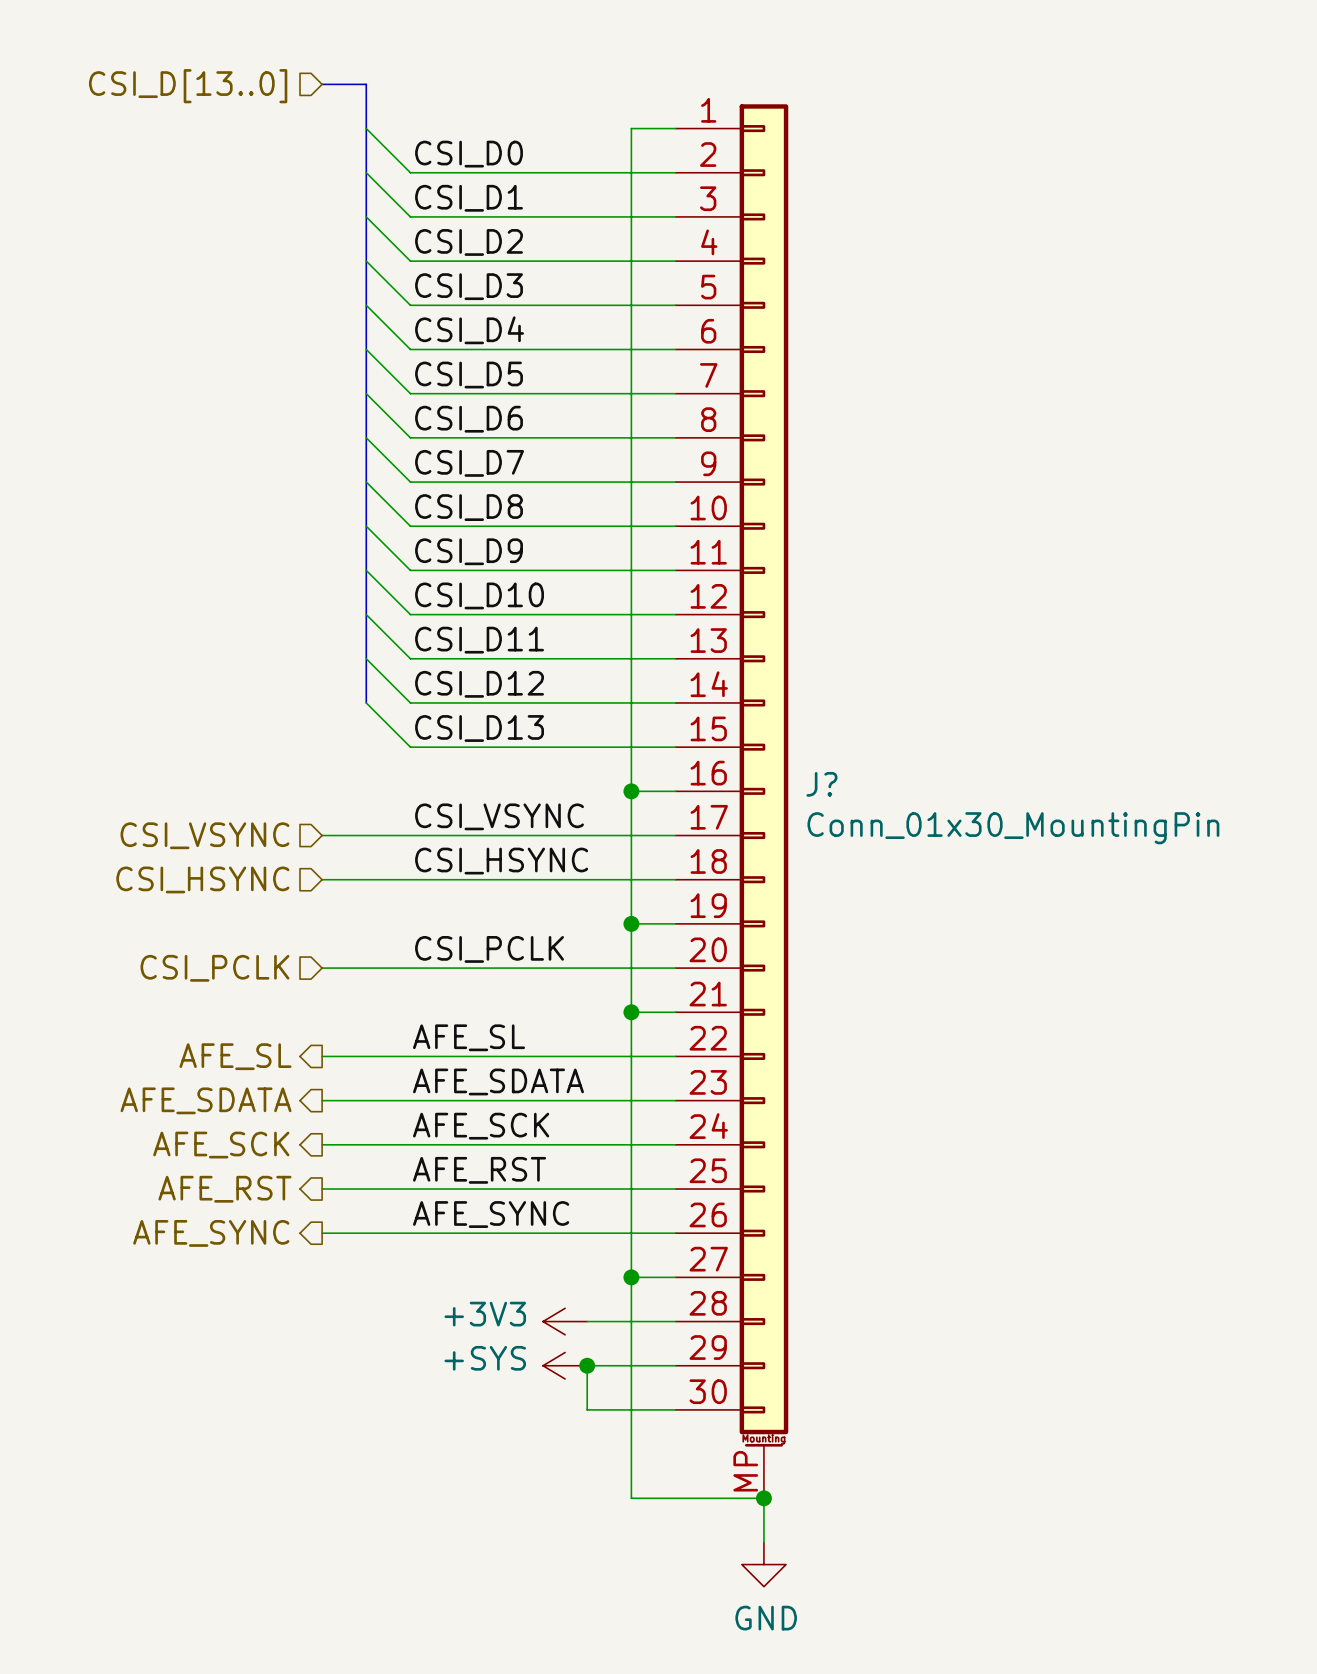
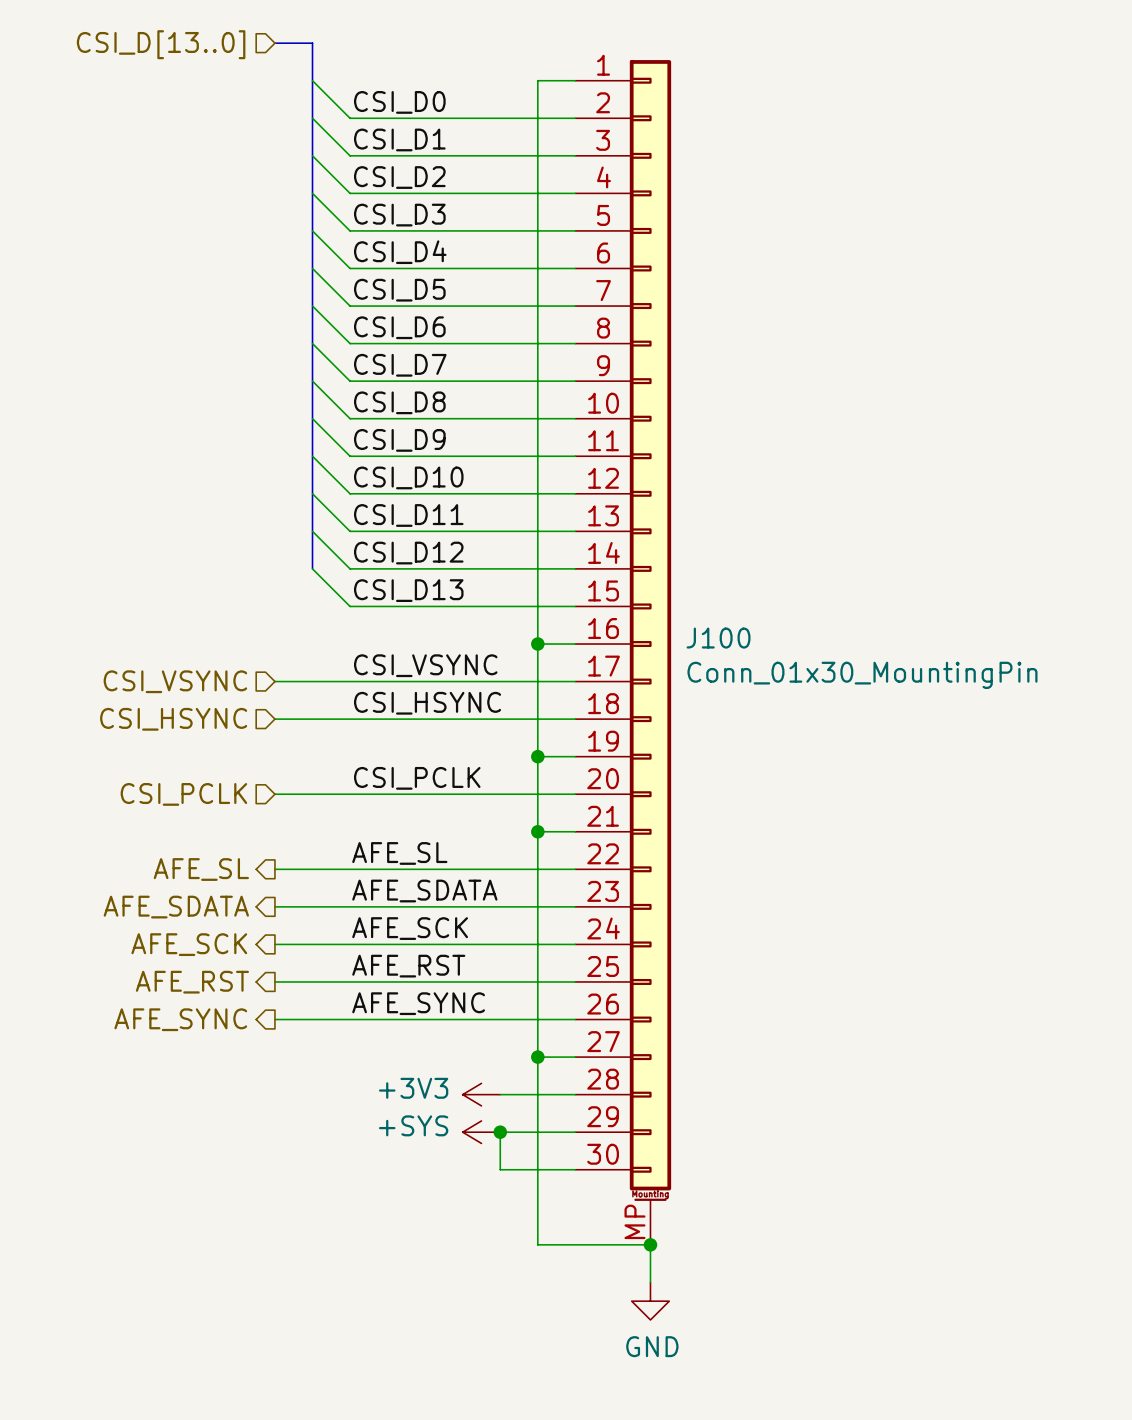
J? name: J? (821, 784) -> J100 (718, 638)

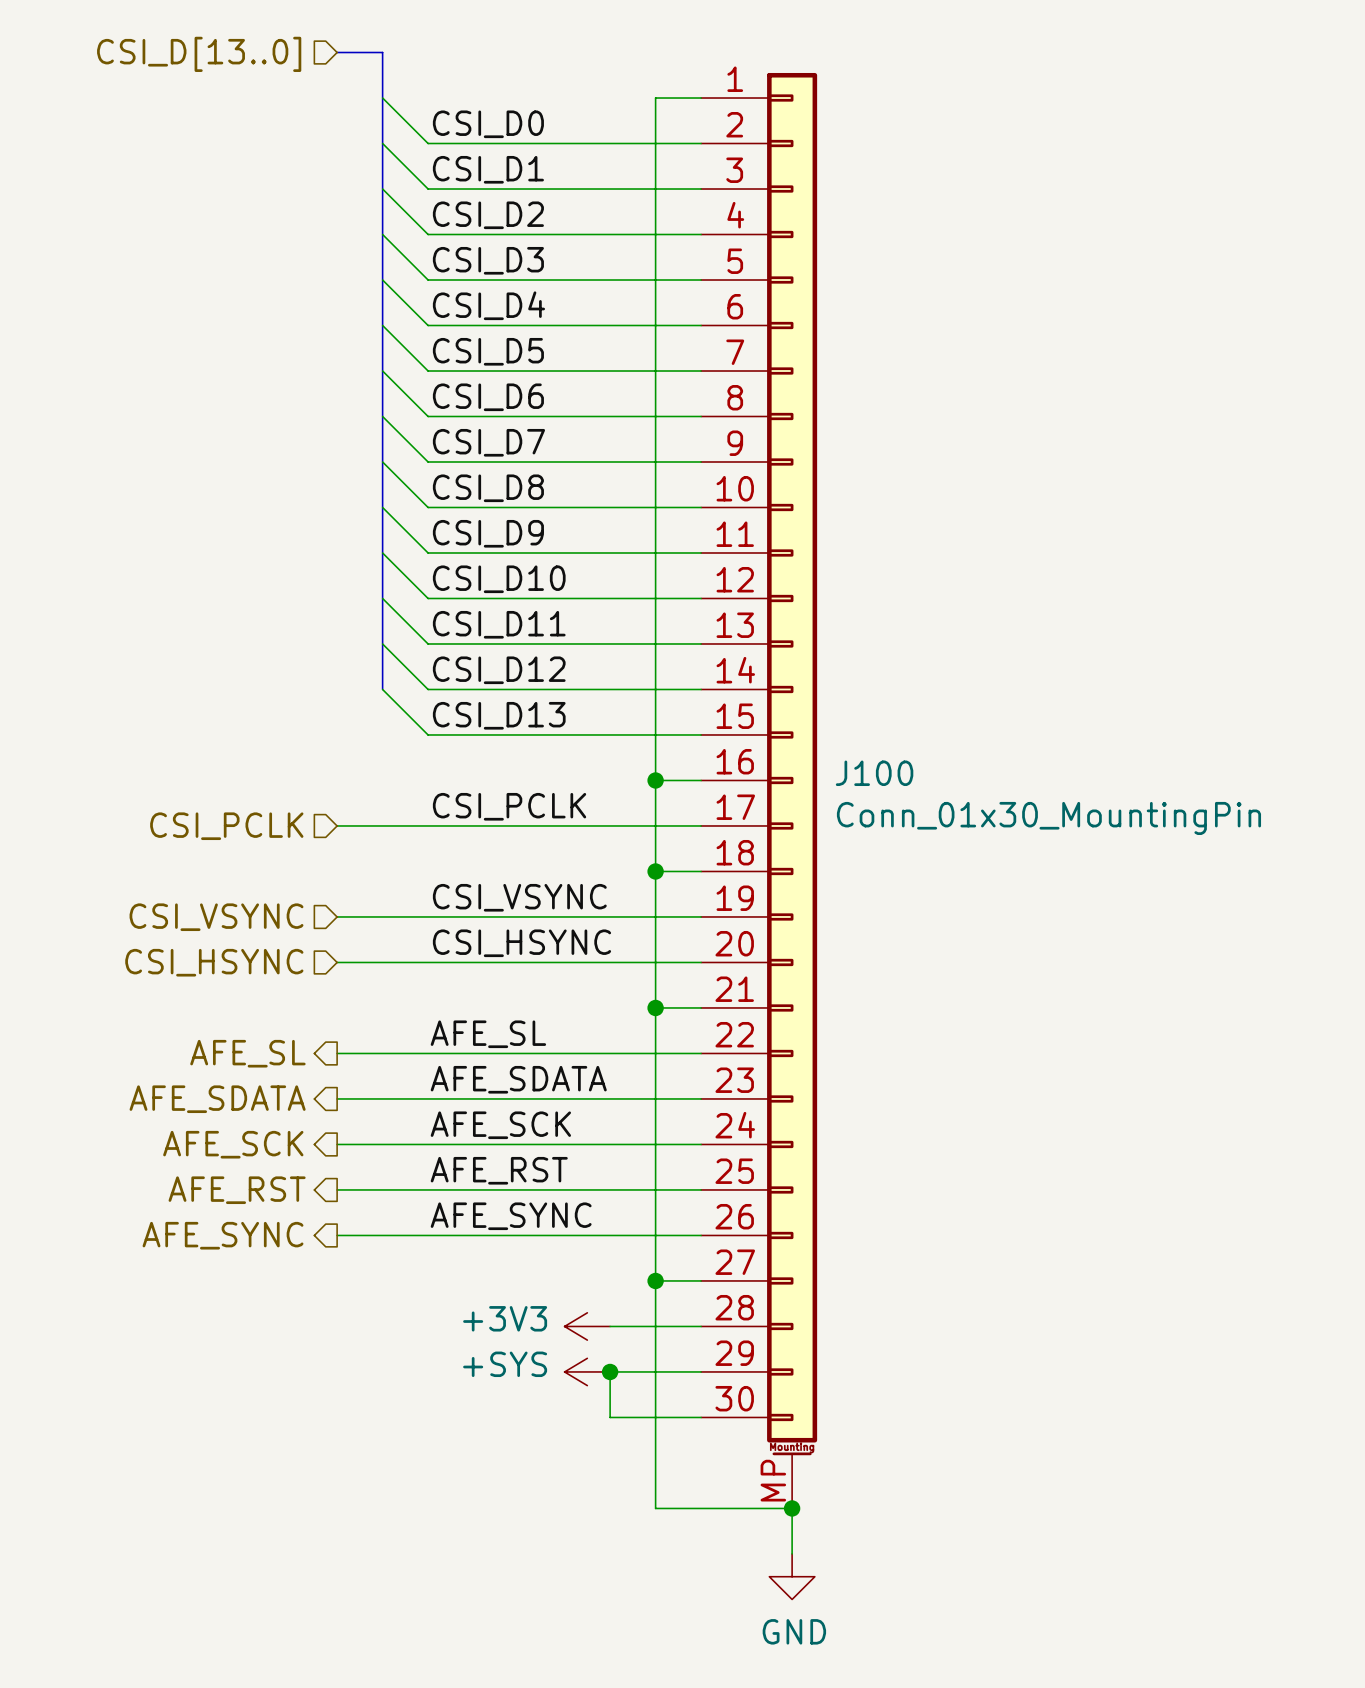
label: CSI_VSYNC (425, 665) -> CSI_PCLK (509, 806)
hierarchical label: CSI_VSYNC (175, 681) -> CSI_PCLK (226, 826)
label: CSI_HSYNC (427, 703) -> CSI_VSYNC (519, 897)
hierarchical label: CSI_HSYNC (173, 719) -> CSI_VSYNC (216, 917)
wire: (274, 719) (537, 719) -> (337, 916) (655, 916)
junction position: (537, 756) -> (655, 871)
label: CSI_PCLK (417, 778) -> CSI_HSYNC (521, 943)
hierarchical label: CSI_PCLK (183, 794) -> CSI_HSYNC (214, 962)

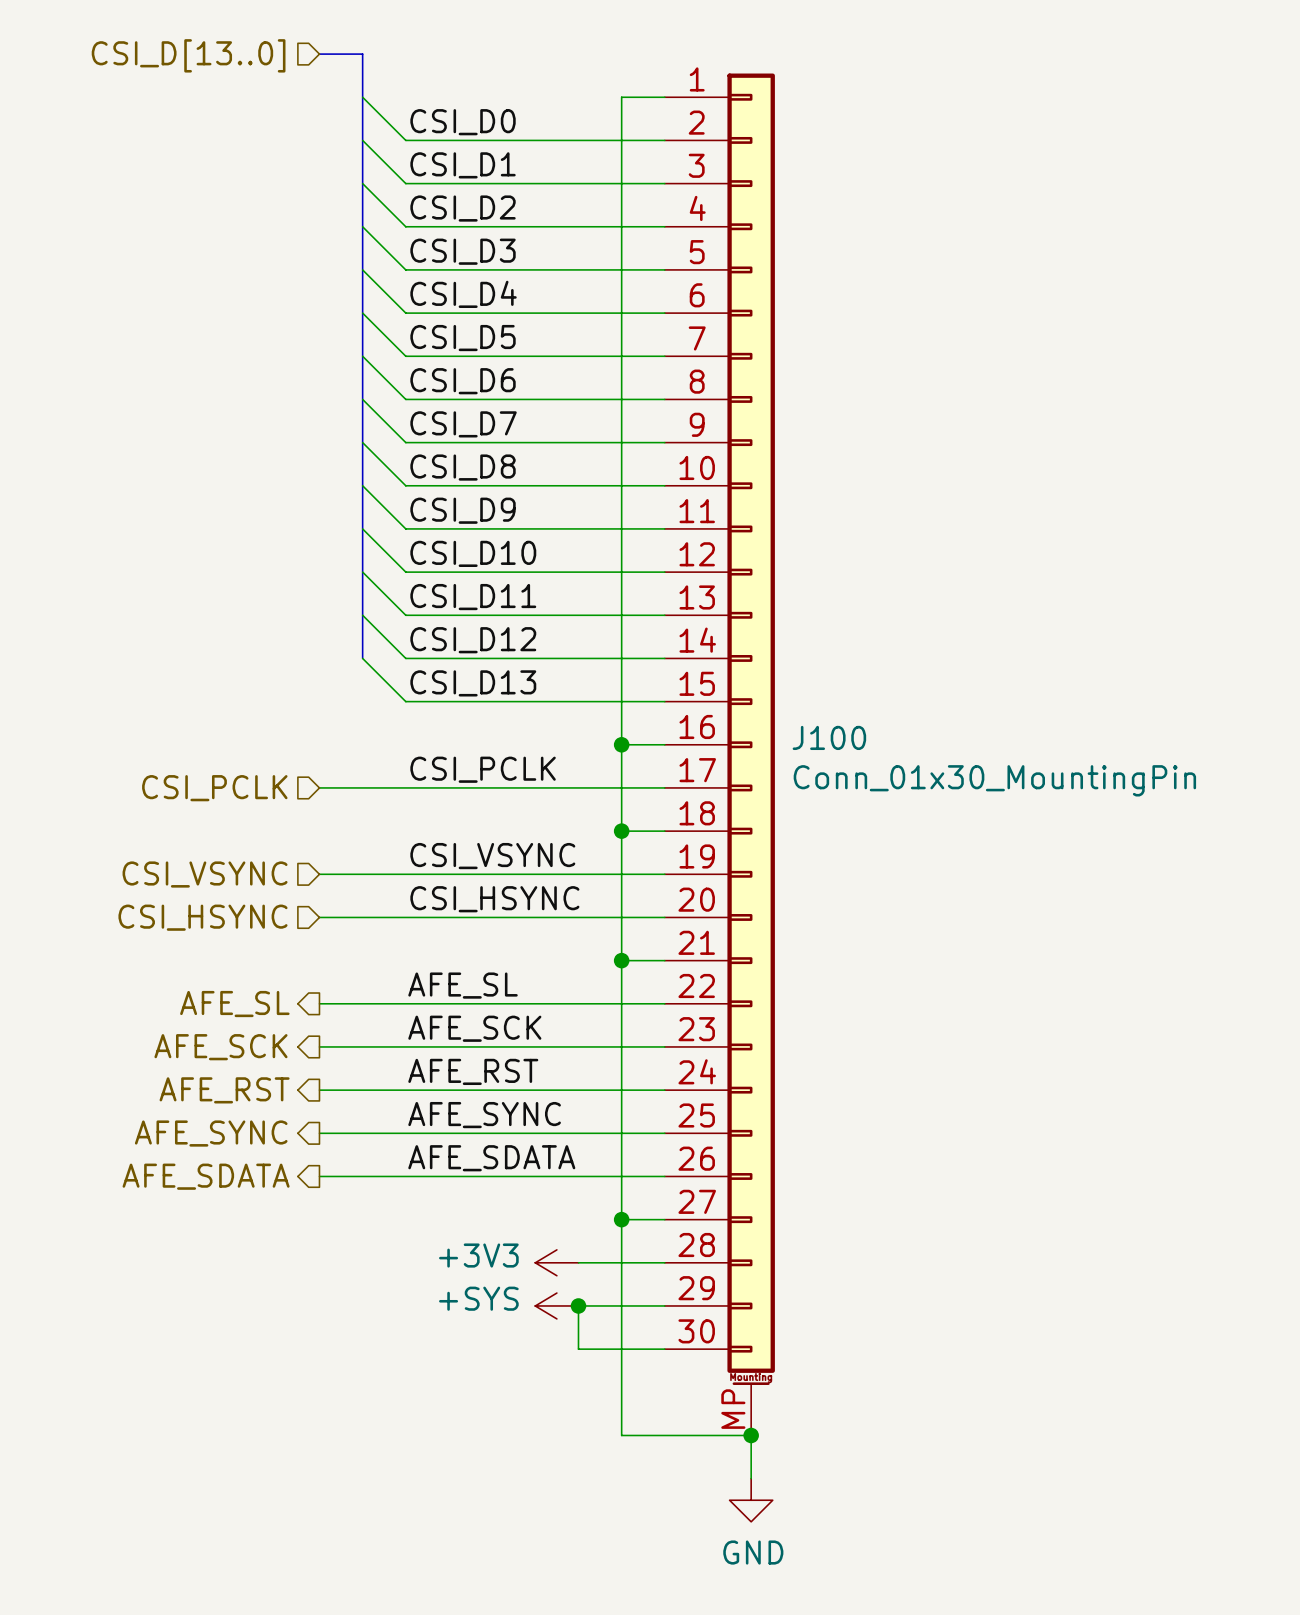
label: AFE_SDATA (518, 1079) -> AFE_SCK (474, 1028)
hierarchical label: AFE_SDATA (217, 1099) -> AFE_SCK (220, 1047)
label: AFE_SCK (500, 1125) -> AFE_RST (473, 1071)
hierarchical label: AFE_SCK (233, 1144) -> AFE_RST (224, 1090)
label: AFE_RST (499, 1170) -> AFE_SYNC (484, 1115)
hierarchical label: AFE_RST (237, 1190) -> AFE_SYNC (211, 1133)
label: AFE_SYNC (511, 1216) -> AFE_SDATA (491, 1158)
hierarchical label: AFE_SYNC (223, 1235) -> AFE_SDATA (206, 1176)

